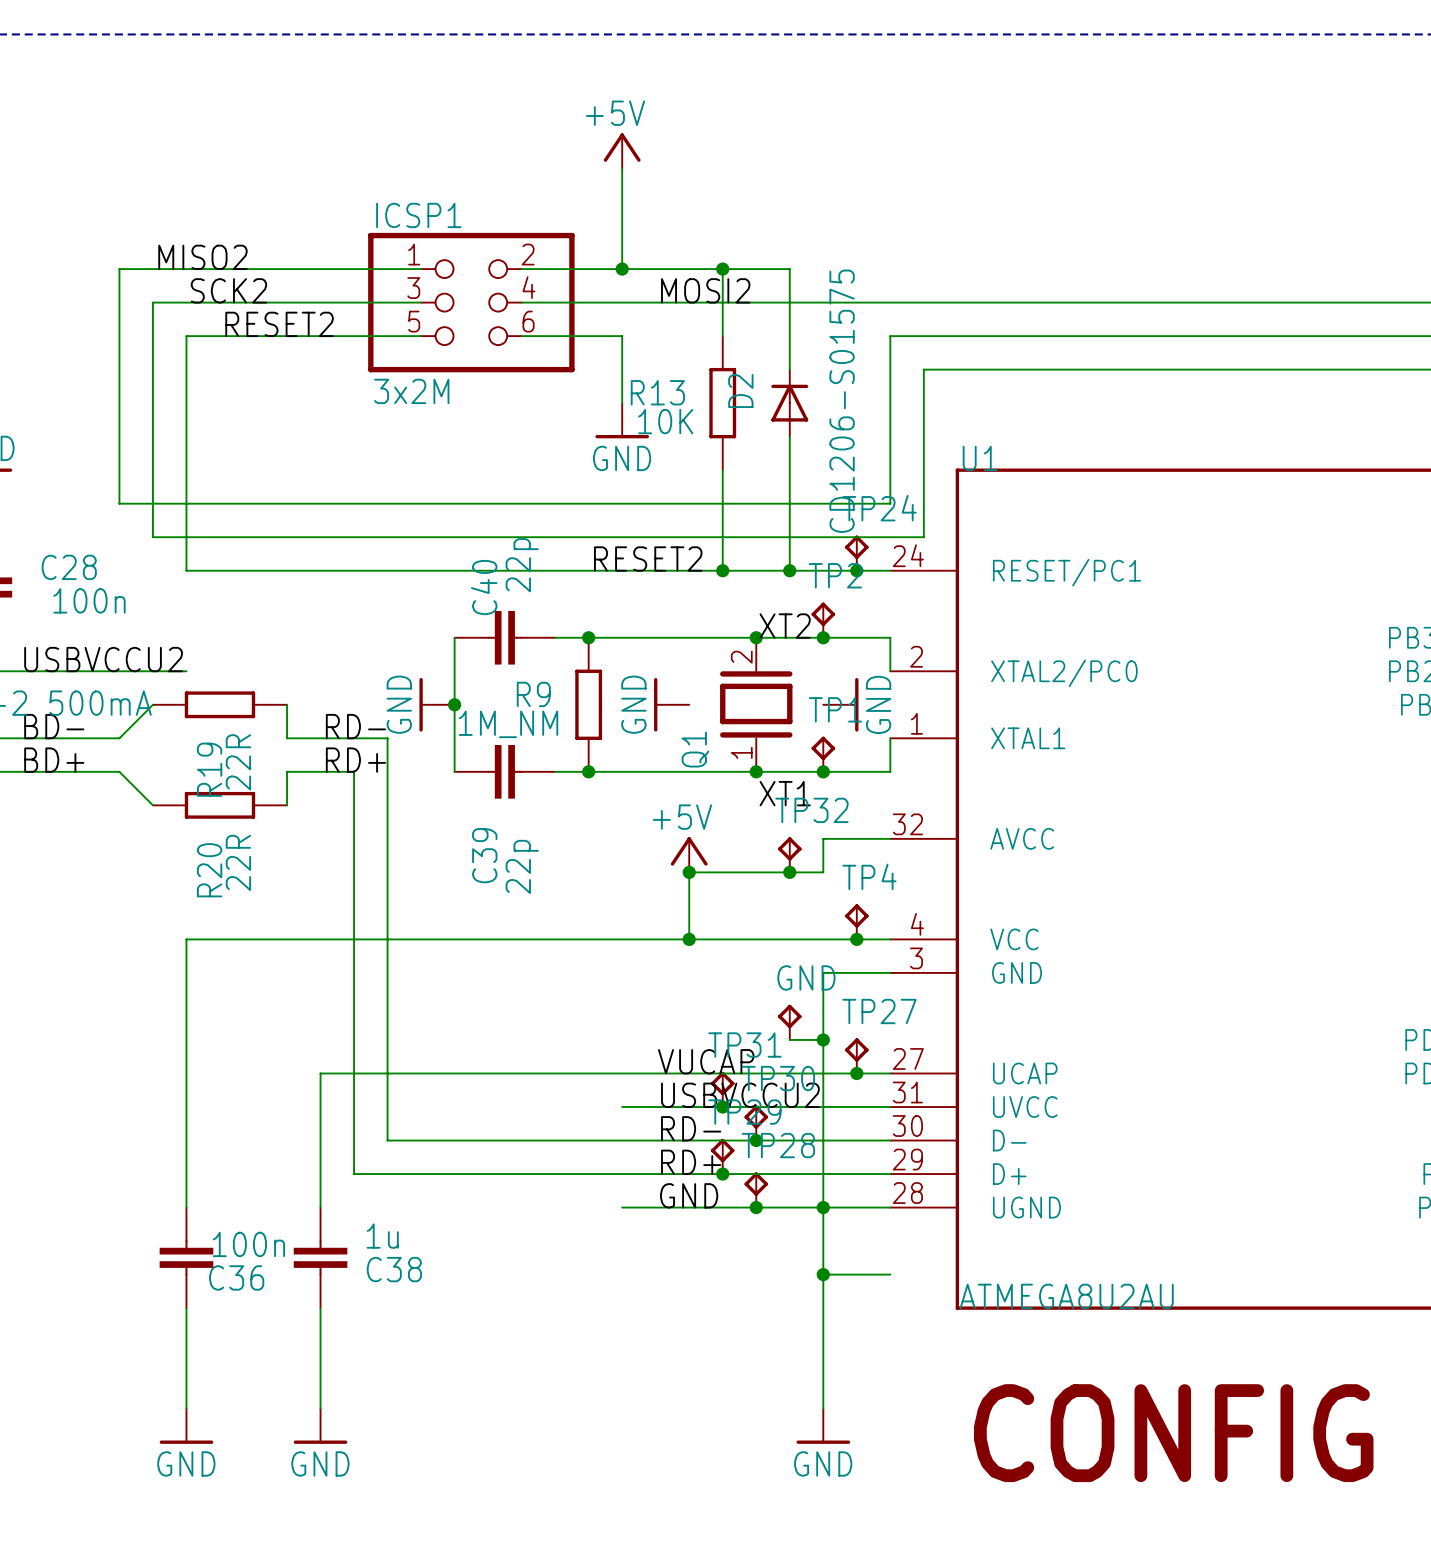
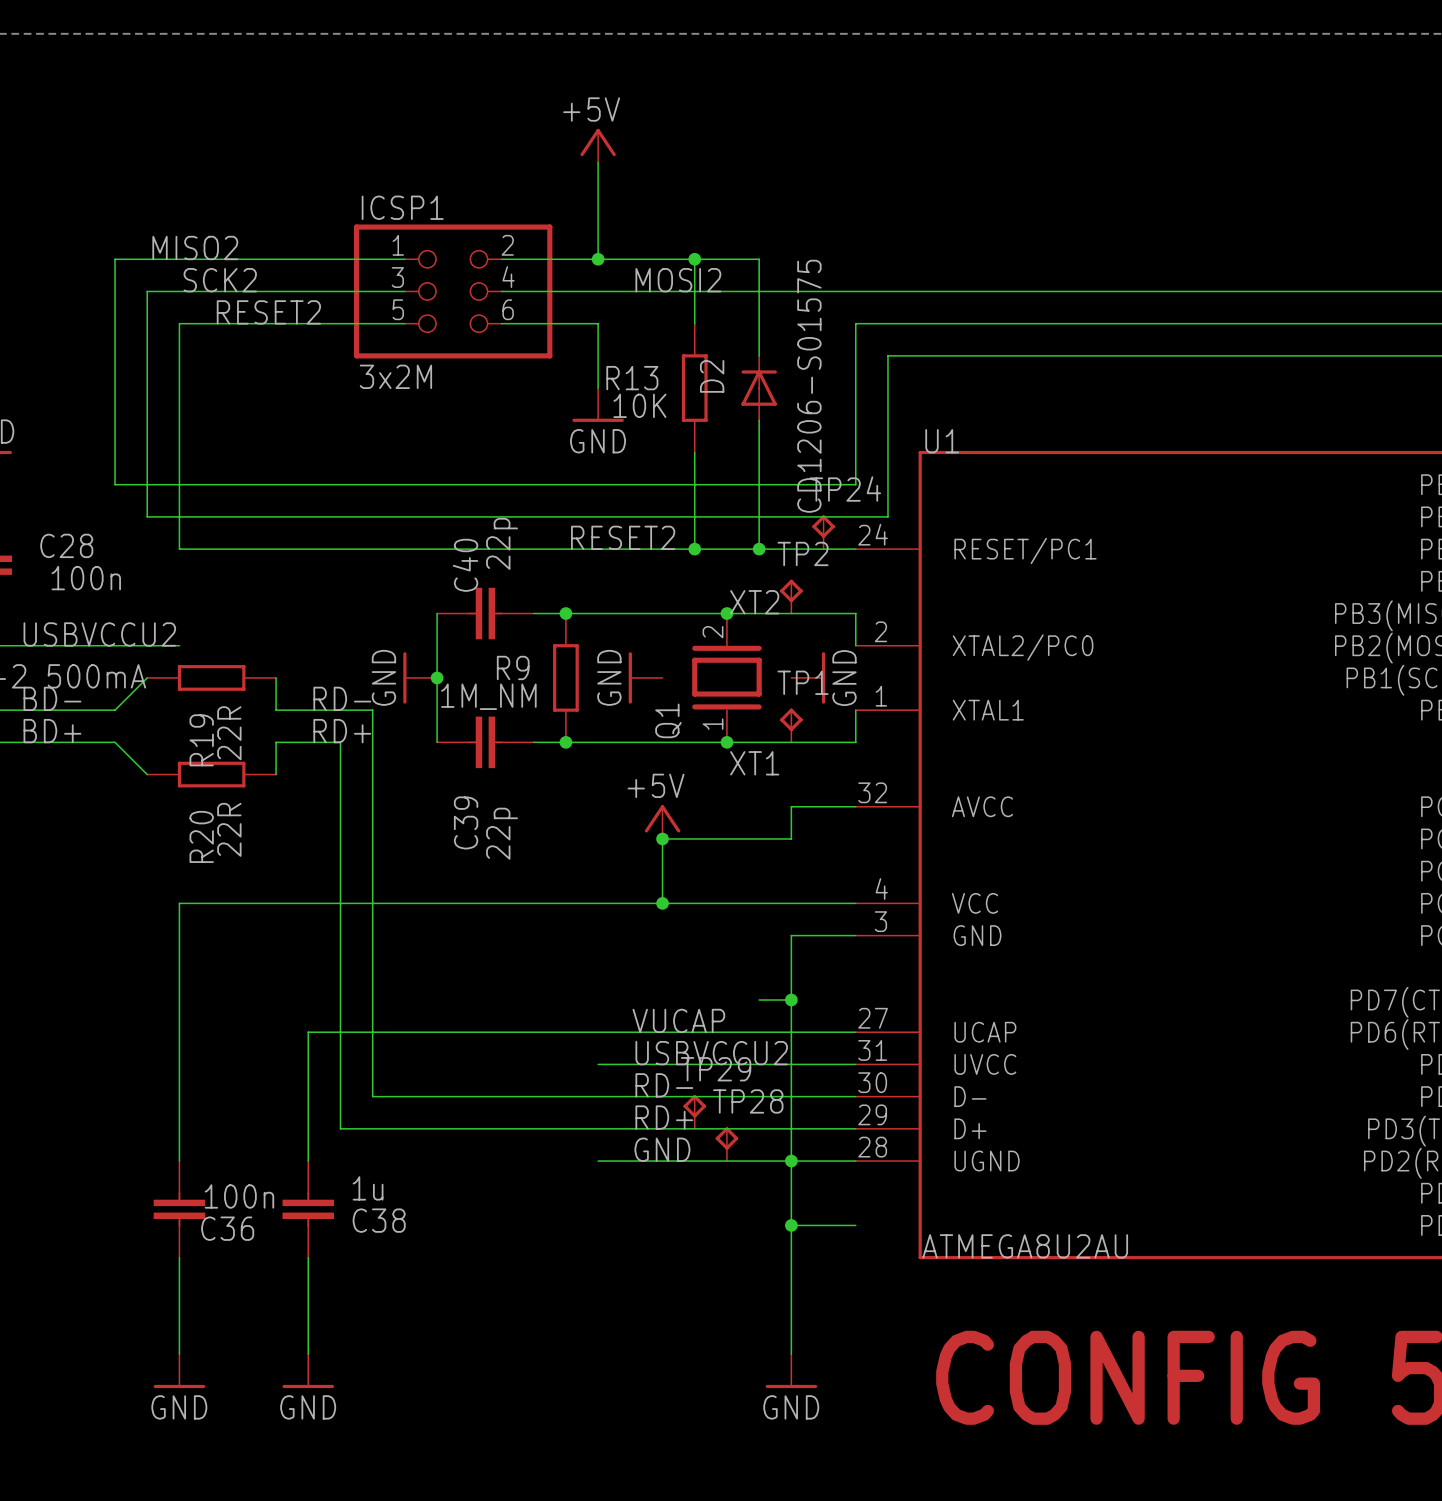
junction: (856, 570) -> none
junction: (823, 637) -> none
junction: (823, 771) -> none
TP32: (789, 854) -> none
junction: (789, 872) -> none
TP4: (856, 921) -> none
junction: (856, 939) -> none
GND: (789, 1022) -> none
TP27: (856, 1055) -> none
junction: (856, 1073) -> none
TP31: (722, 1089) -> none
junction: (722, 1107) -> none
TP30: (756, 1122) -> none
junction: (756, 1140) -> none
junction: (722, 1174) -> none
junction: (756, 1207) -> none

